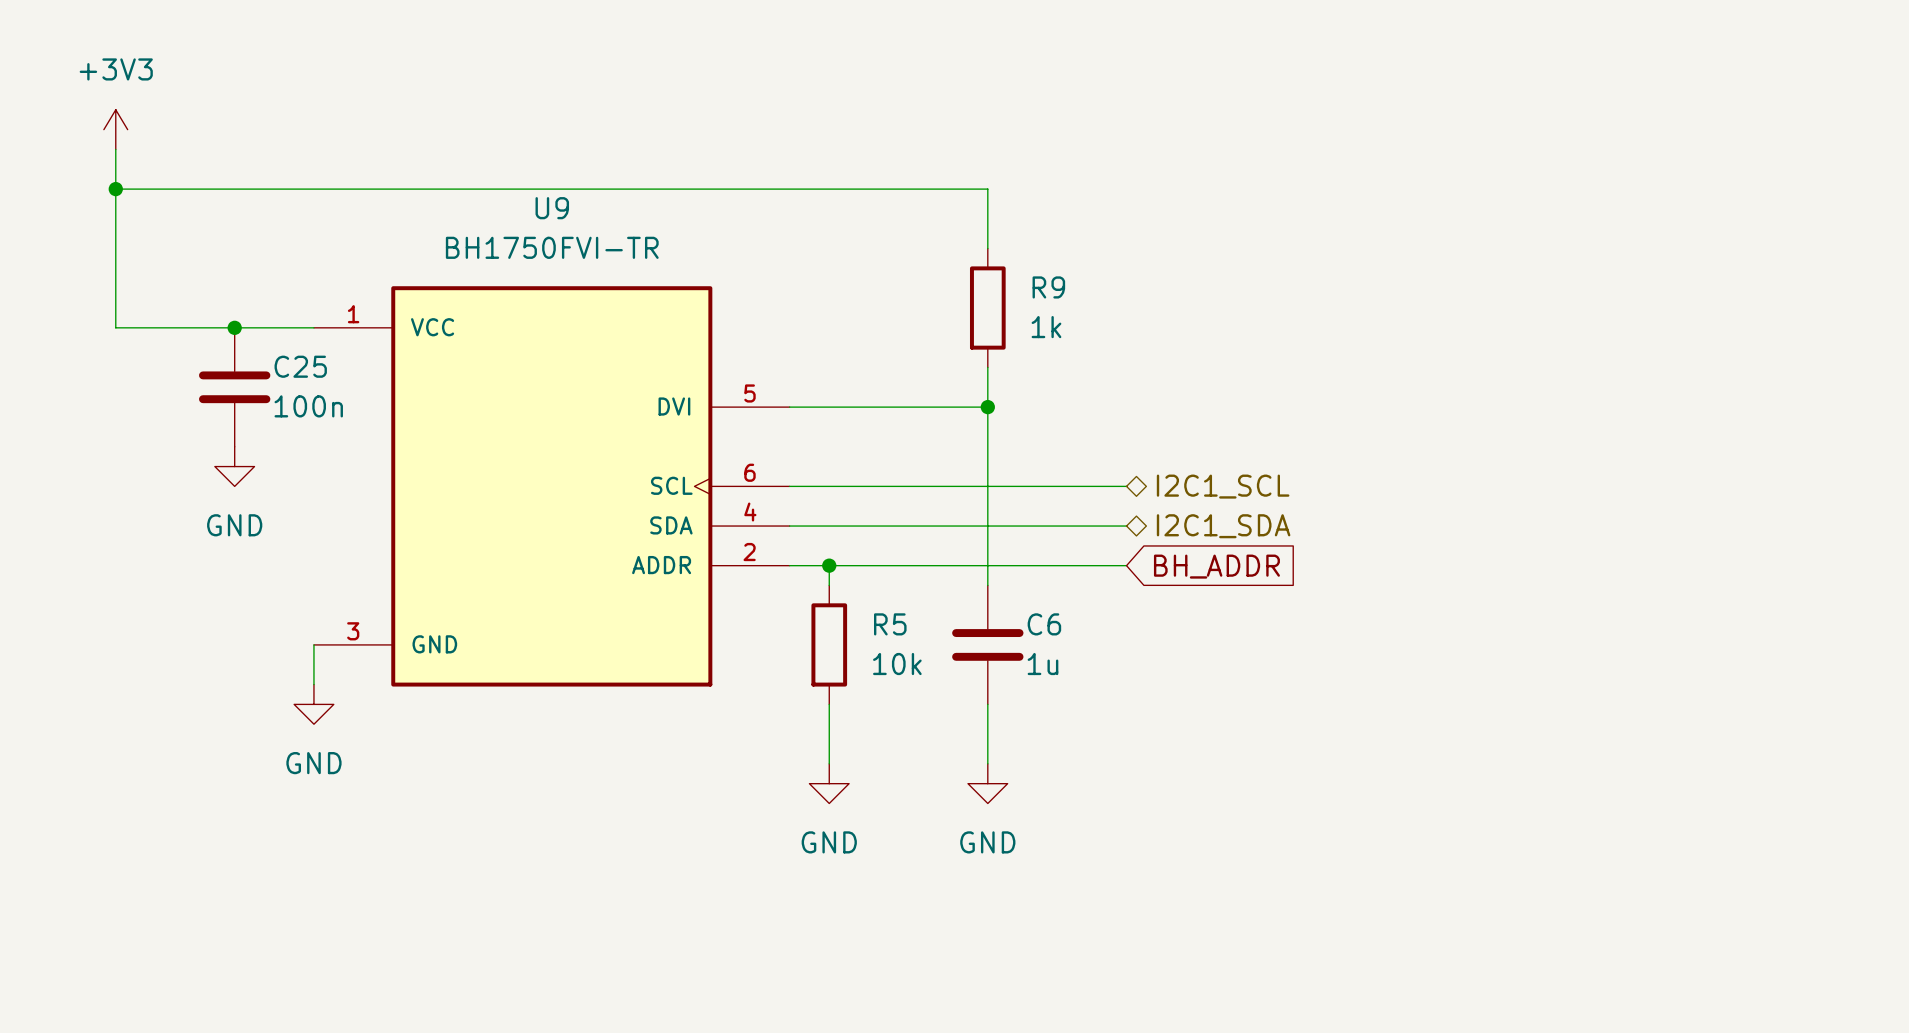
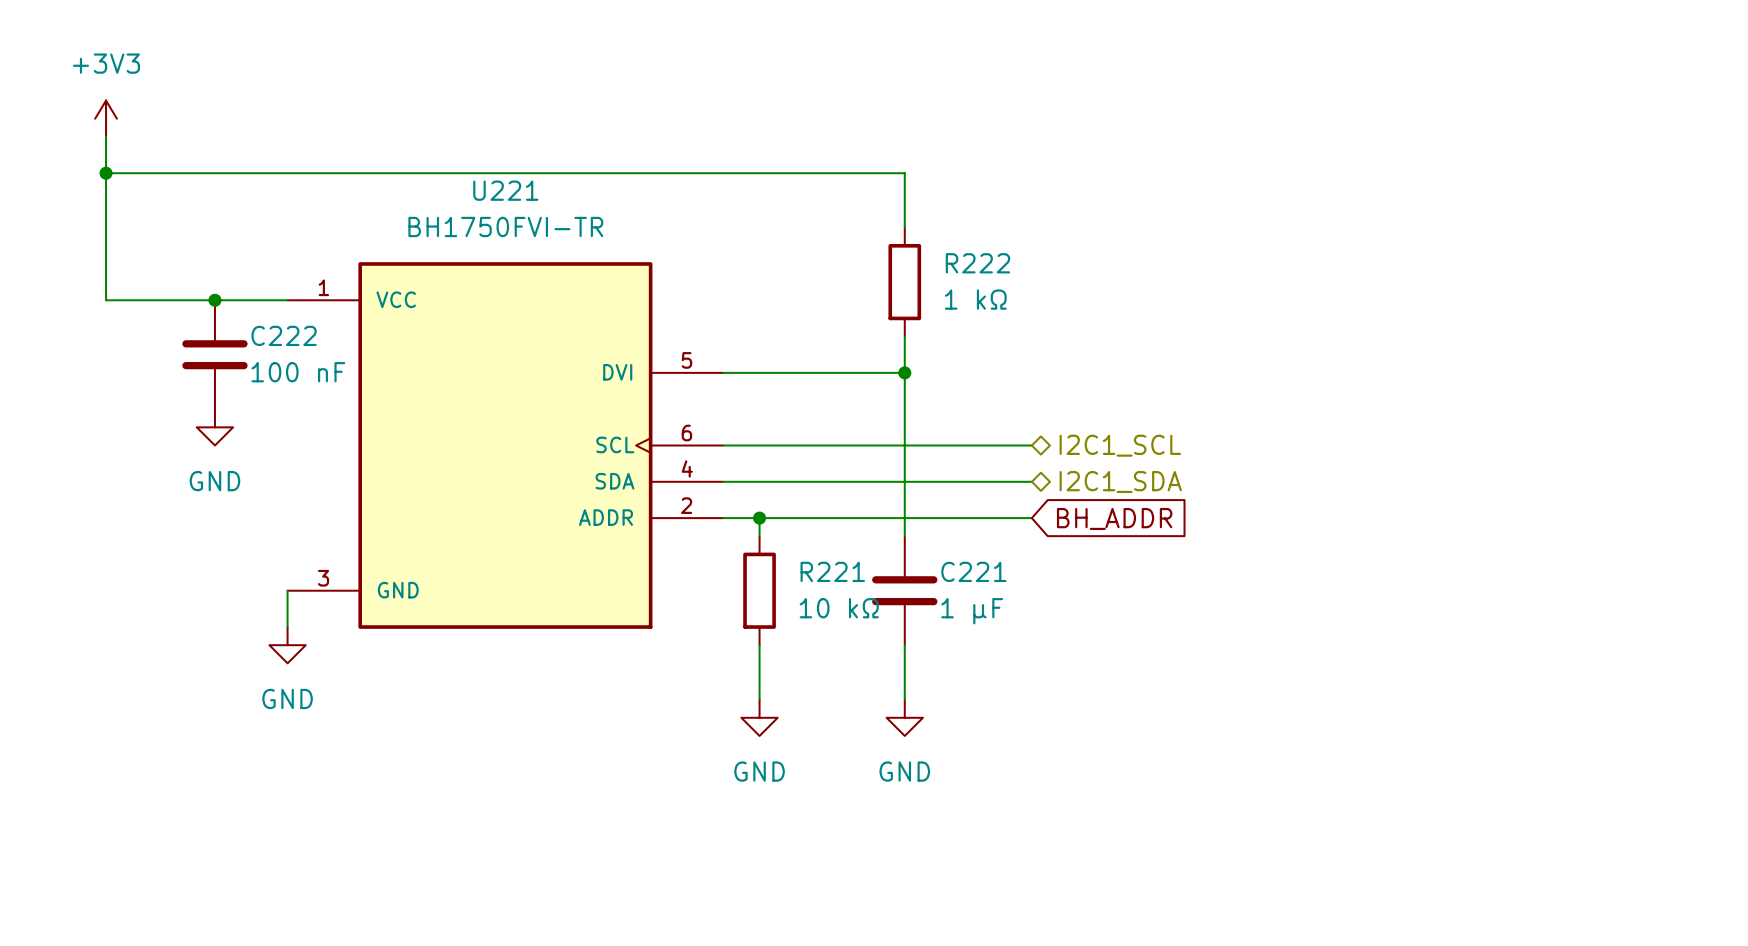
U9 name: U9 (552, 208) -> U221 (505, 190)
R9 name: R9 (1048, 287) -> R222 (977, 263)
R9 value: 1k (1046, 327) -> 1 kΩ (975, 299)
C25 name: C25 (300, 366) -> C222 (284, 335)
C25 value: 100n (308, 406) -> 100 nF (298, 372)
R5 name: R5 (890, 624) -> R221 (832, 571)
C6 name: C6 (1044, 624) -> C221 (973, 571)
R5 value: 10k (897, 664) -> 10 kΩ (839, 608)
C6 value: 1u (1042, 664) -> 1 µF (972, 611)

